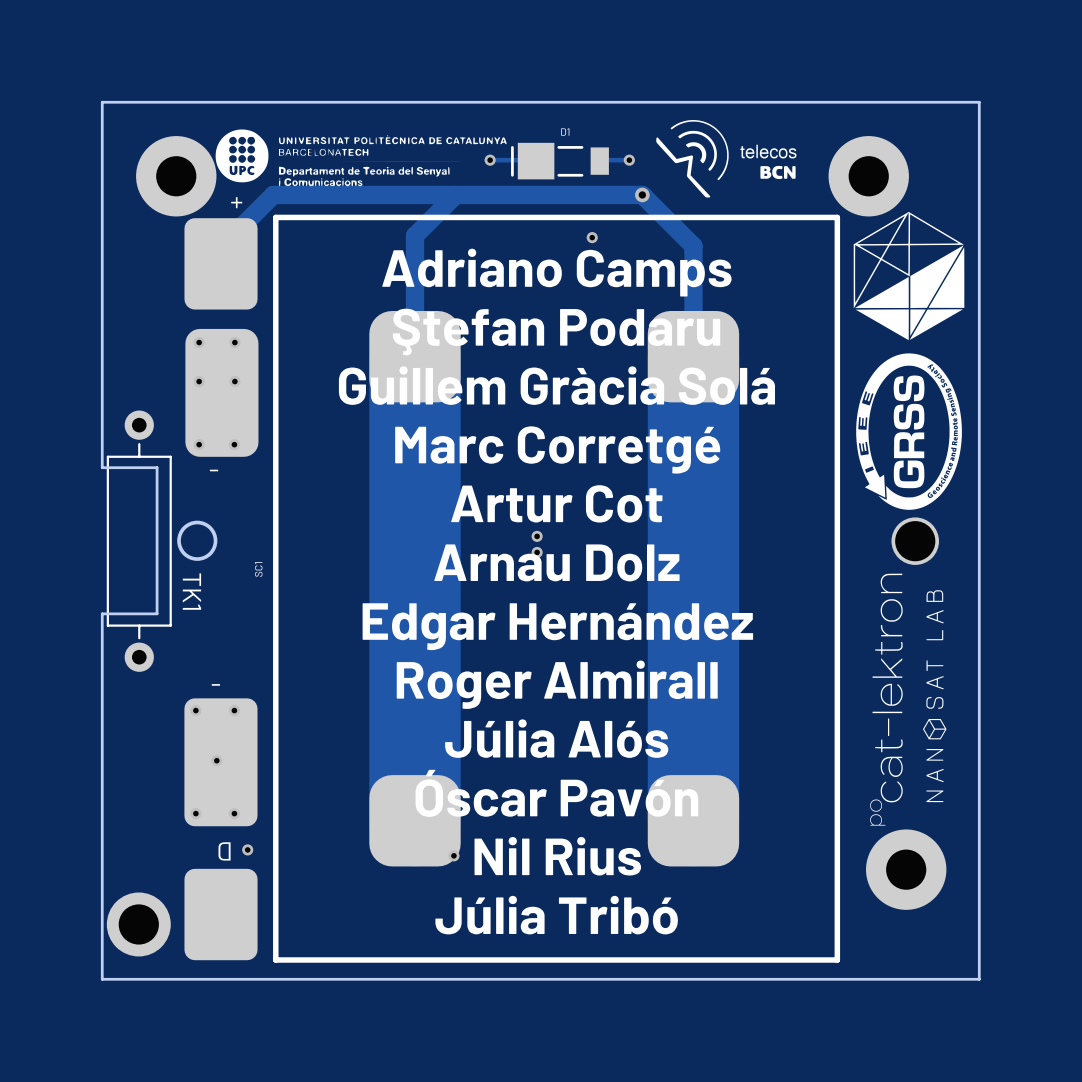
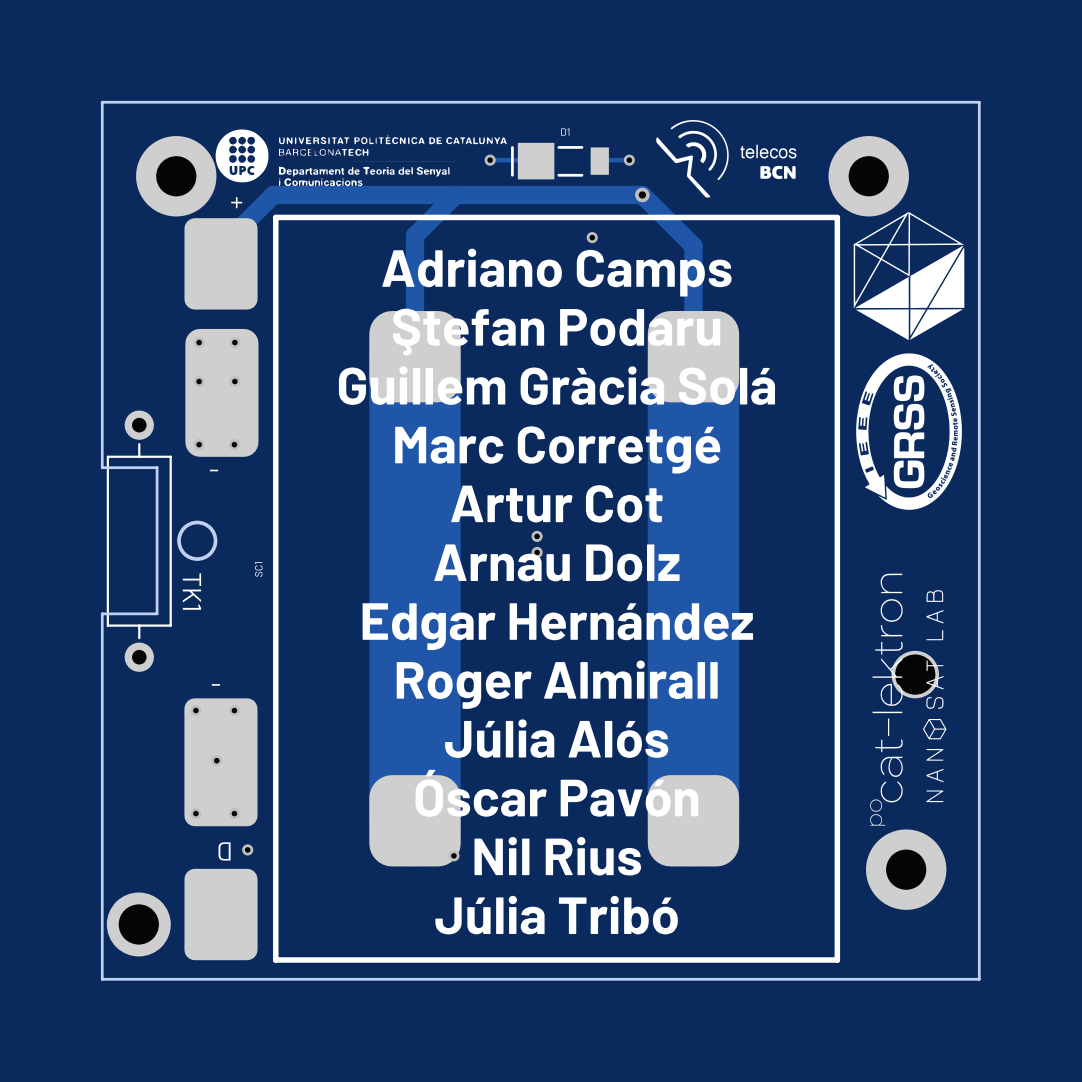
part position: (915, 541) -> (915, 674)

